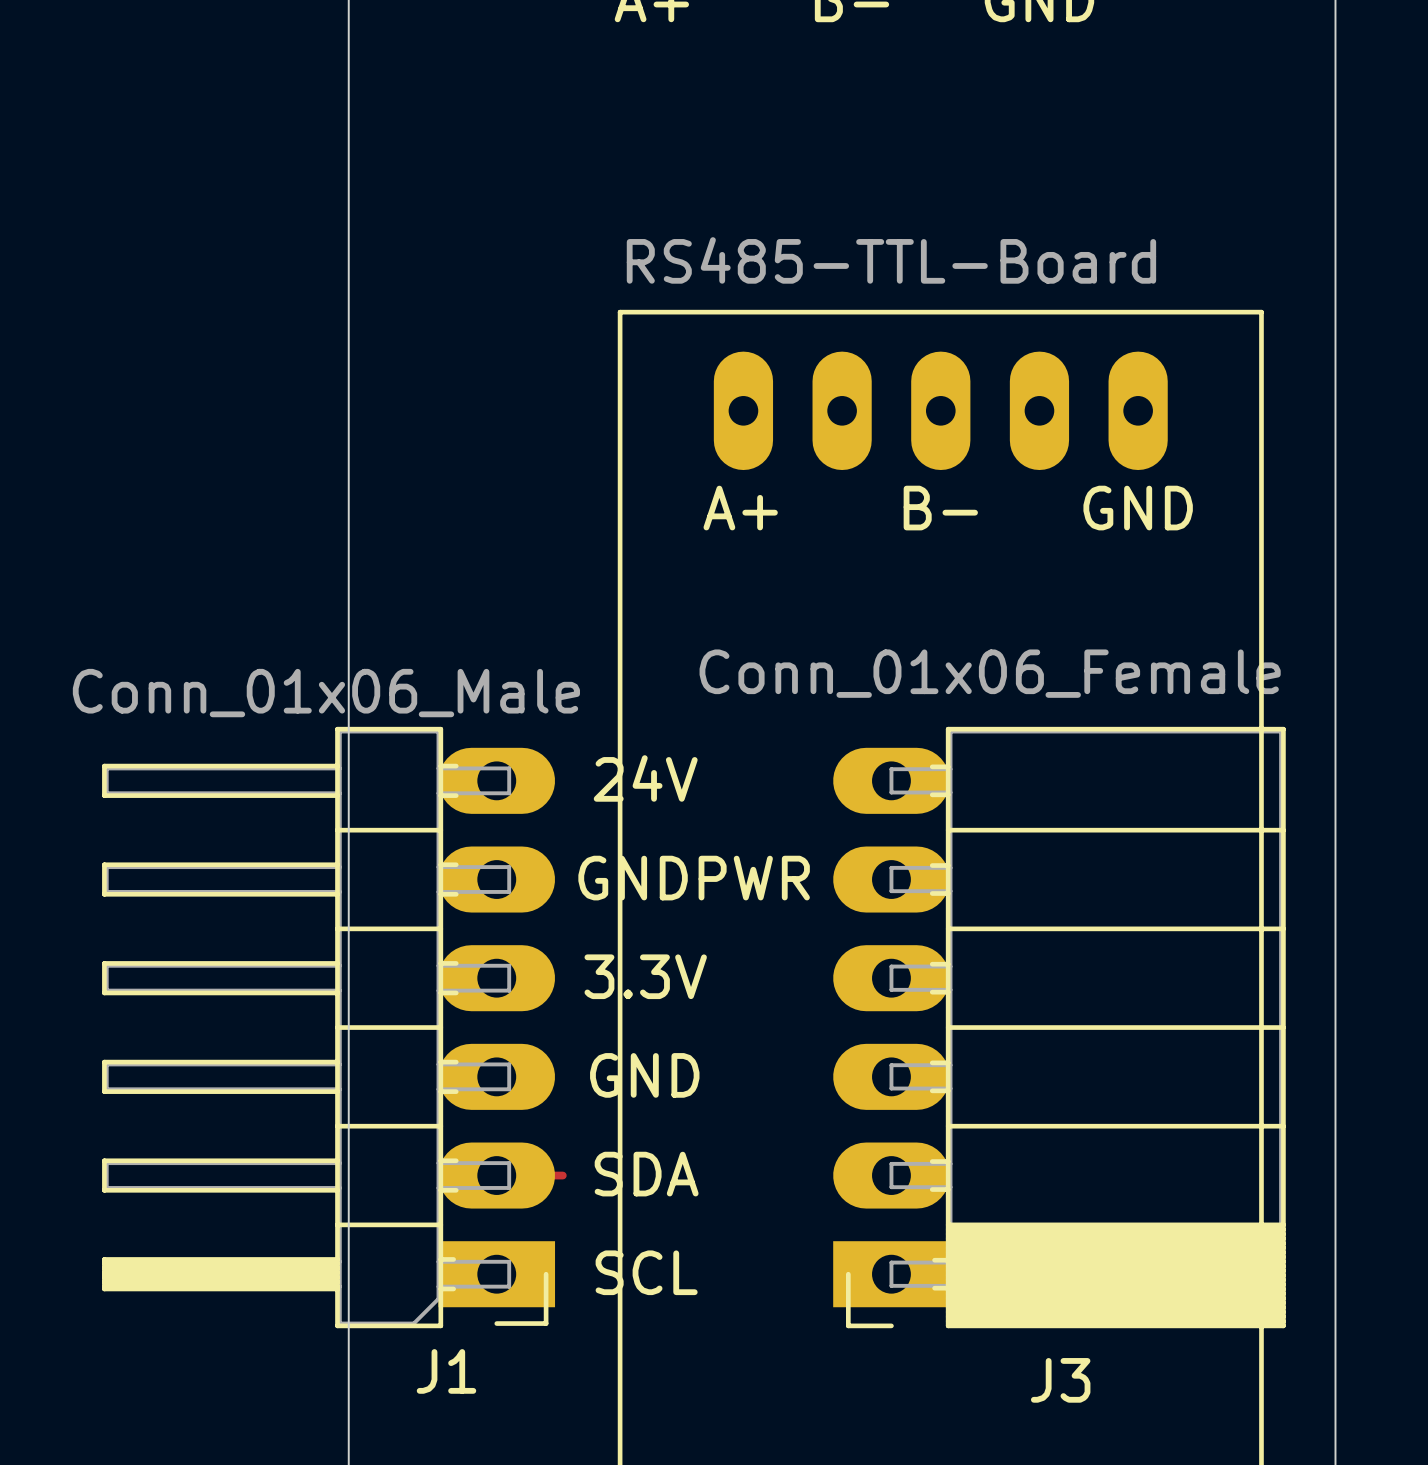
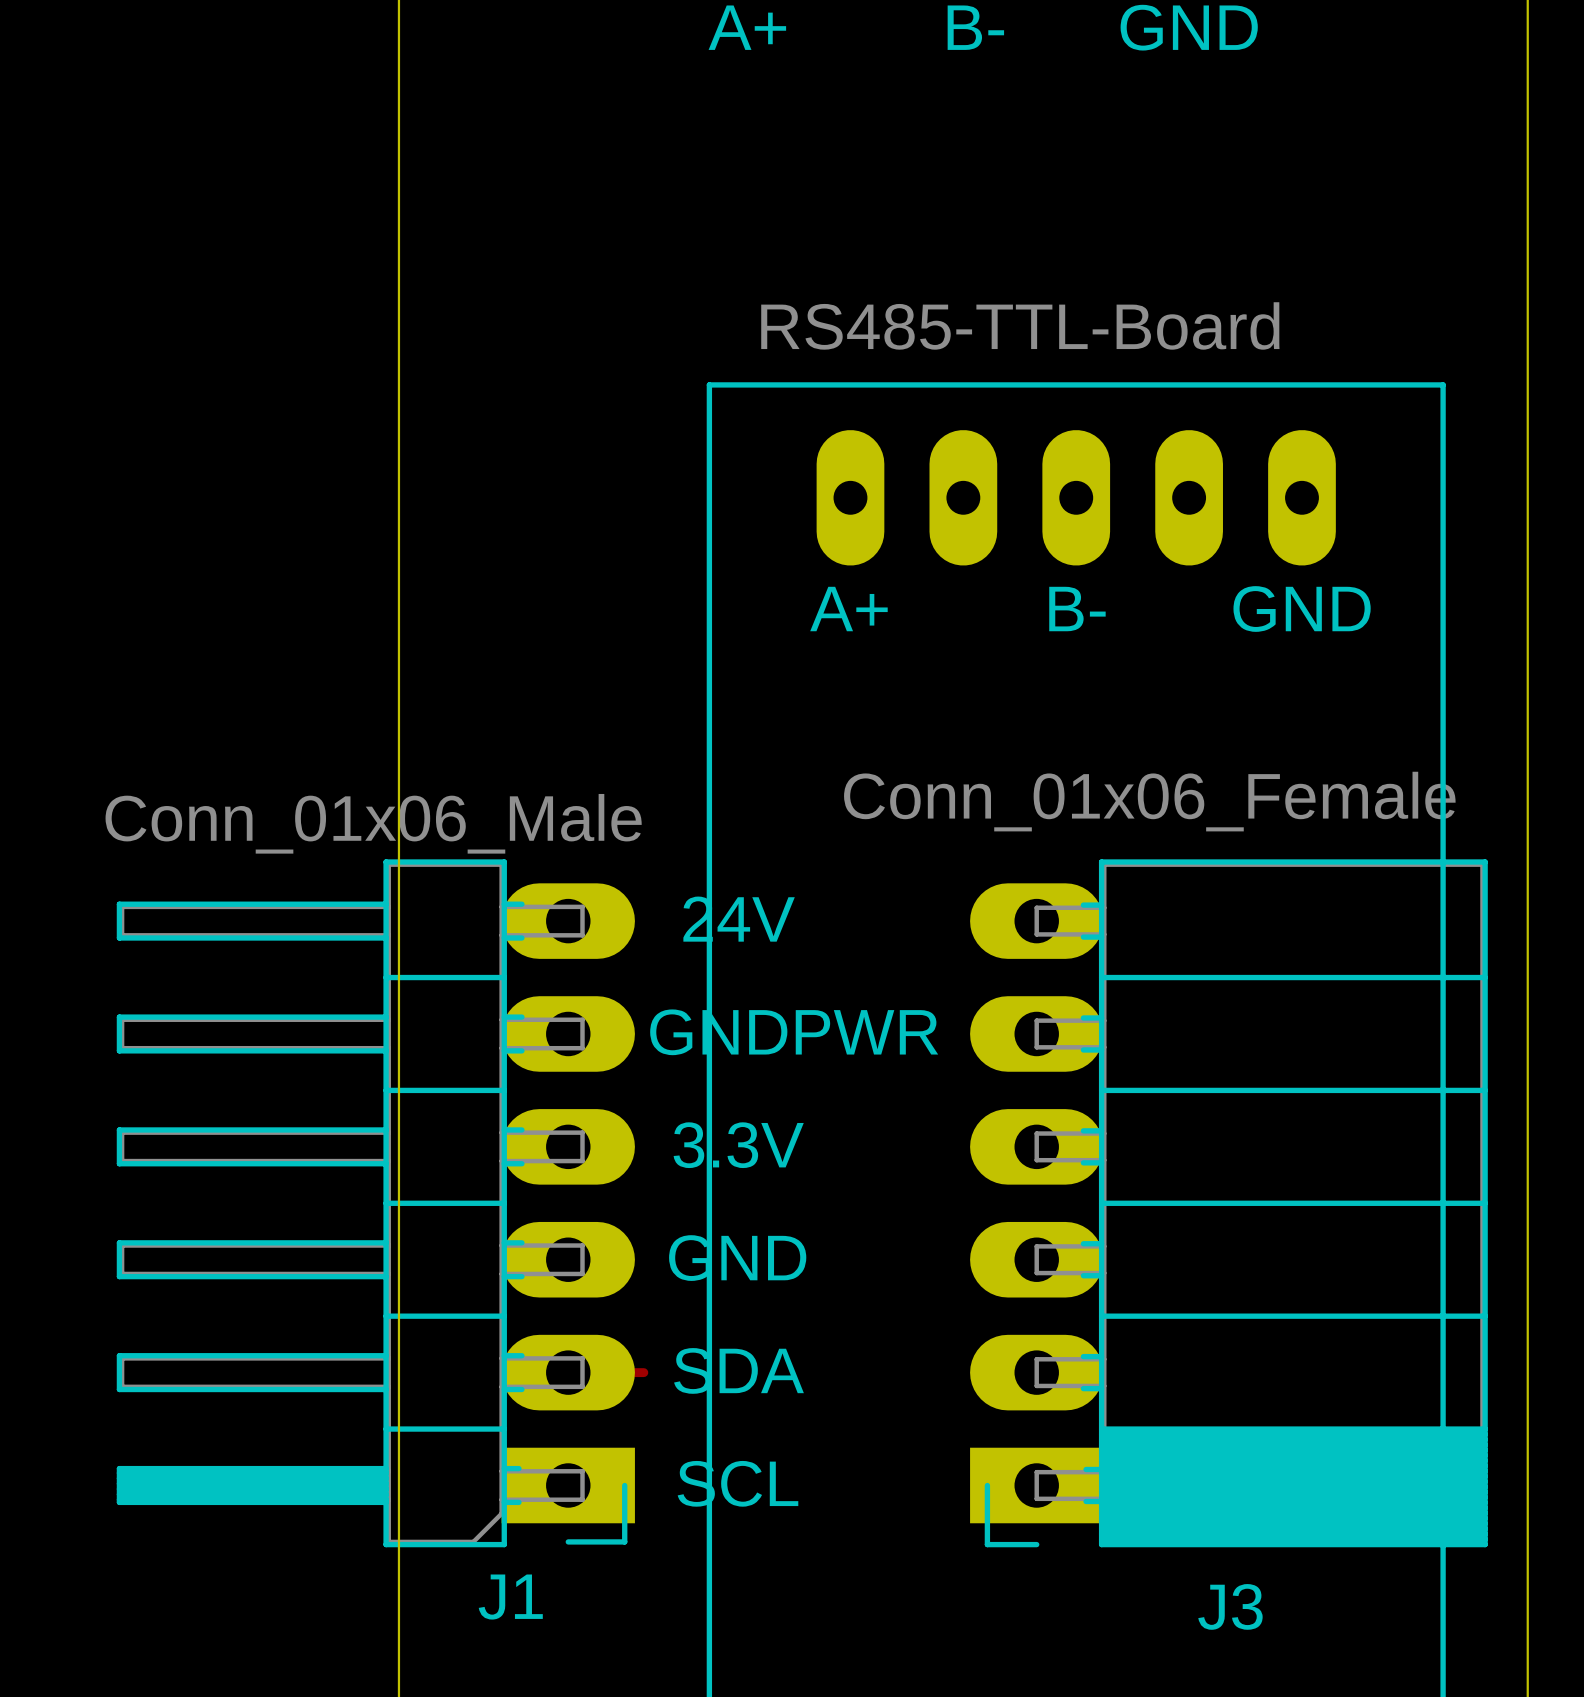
J3 position: (1059, 1027) -> (1228, 1203)

